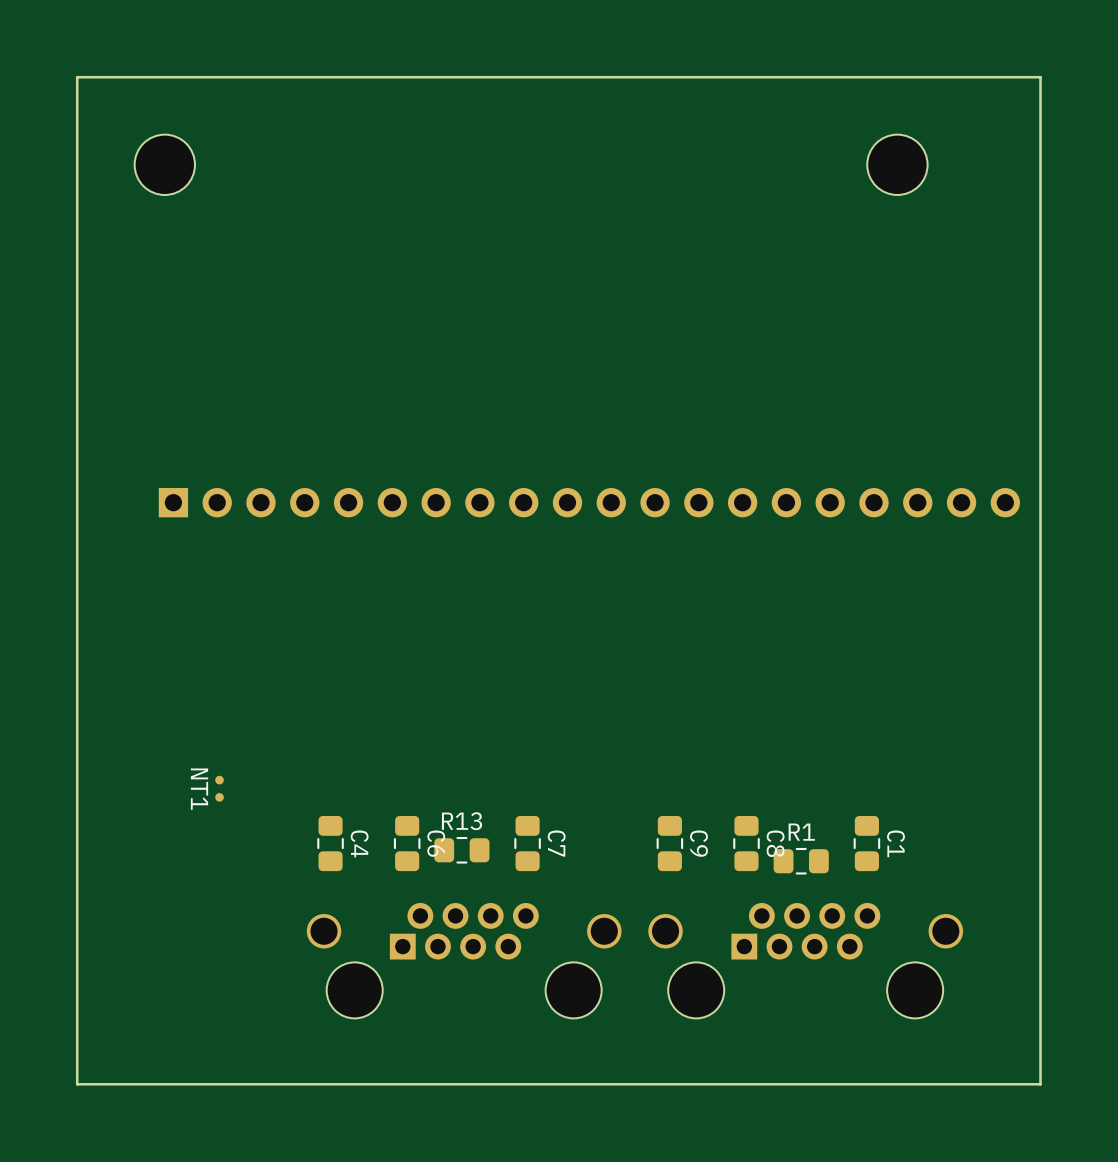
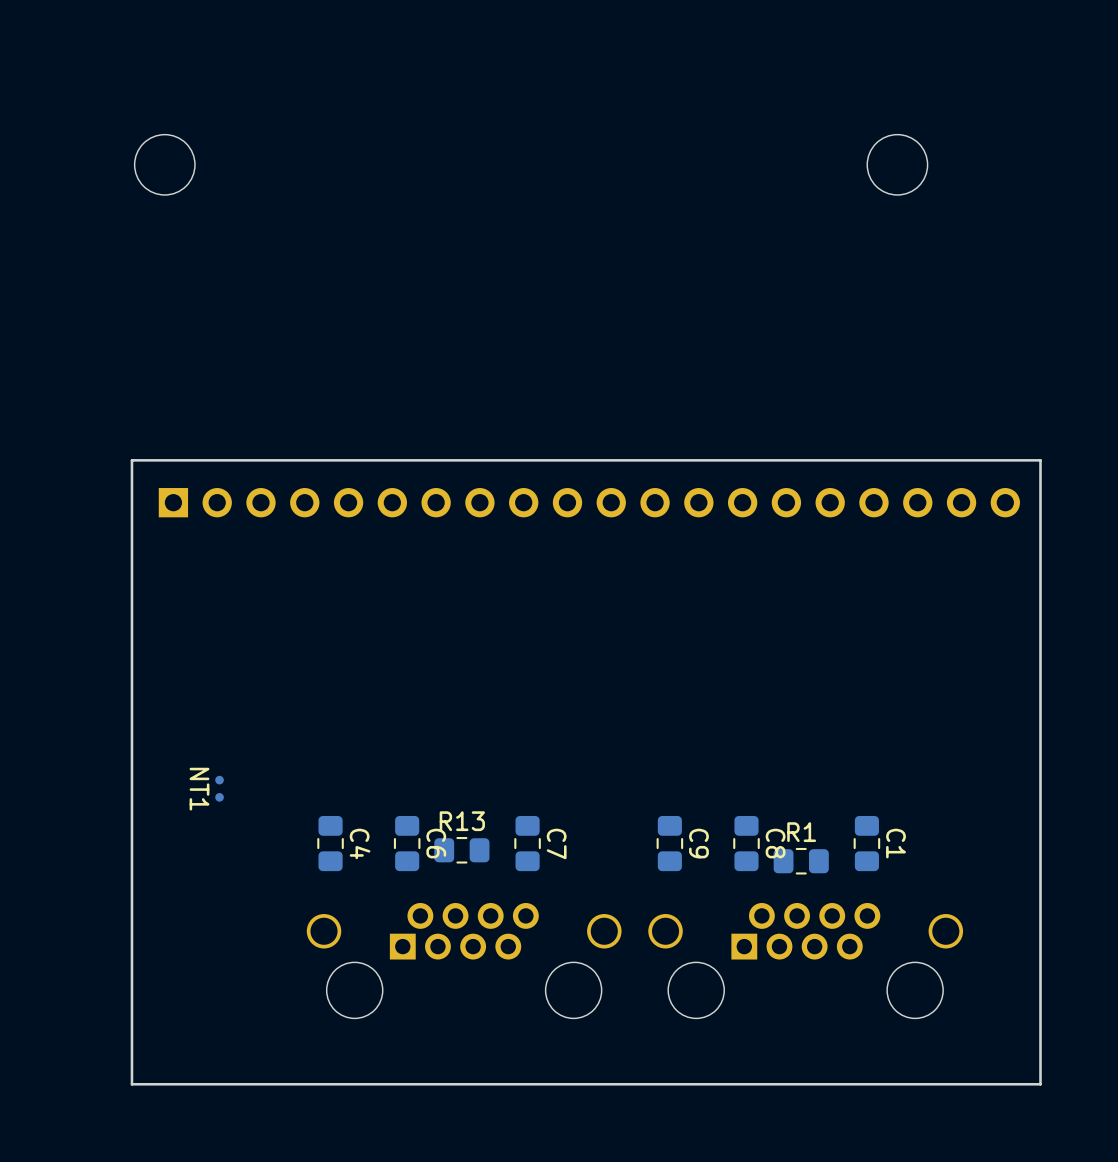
board edge: (1040, 460) (1040, 77) (77, 77) (77, 1084) (131, 1084) -> (1040, 460) (131, 460) (131, 1084)

